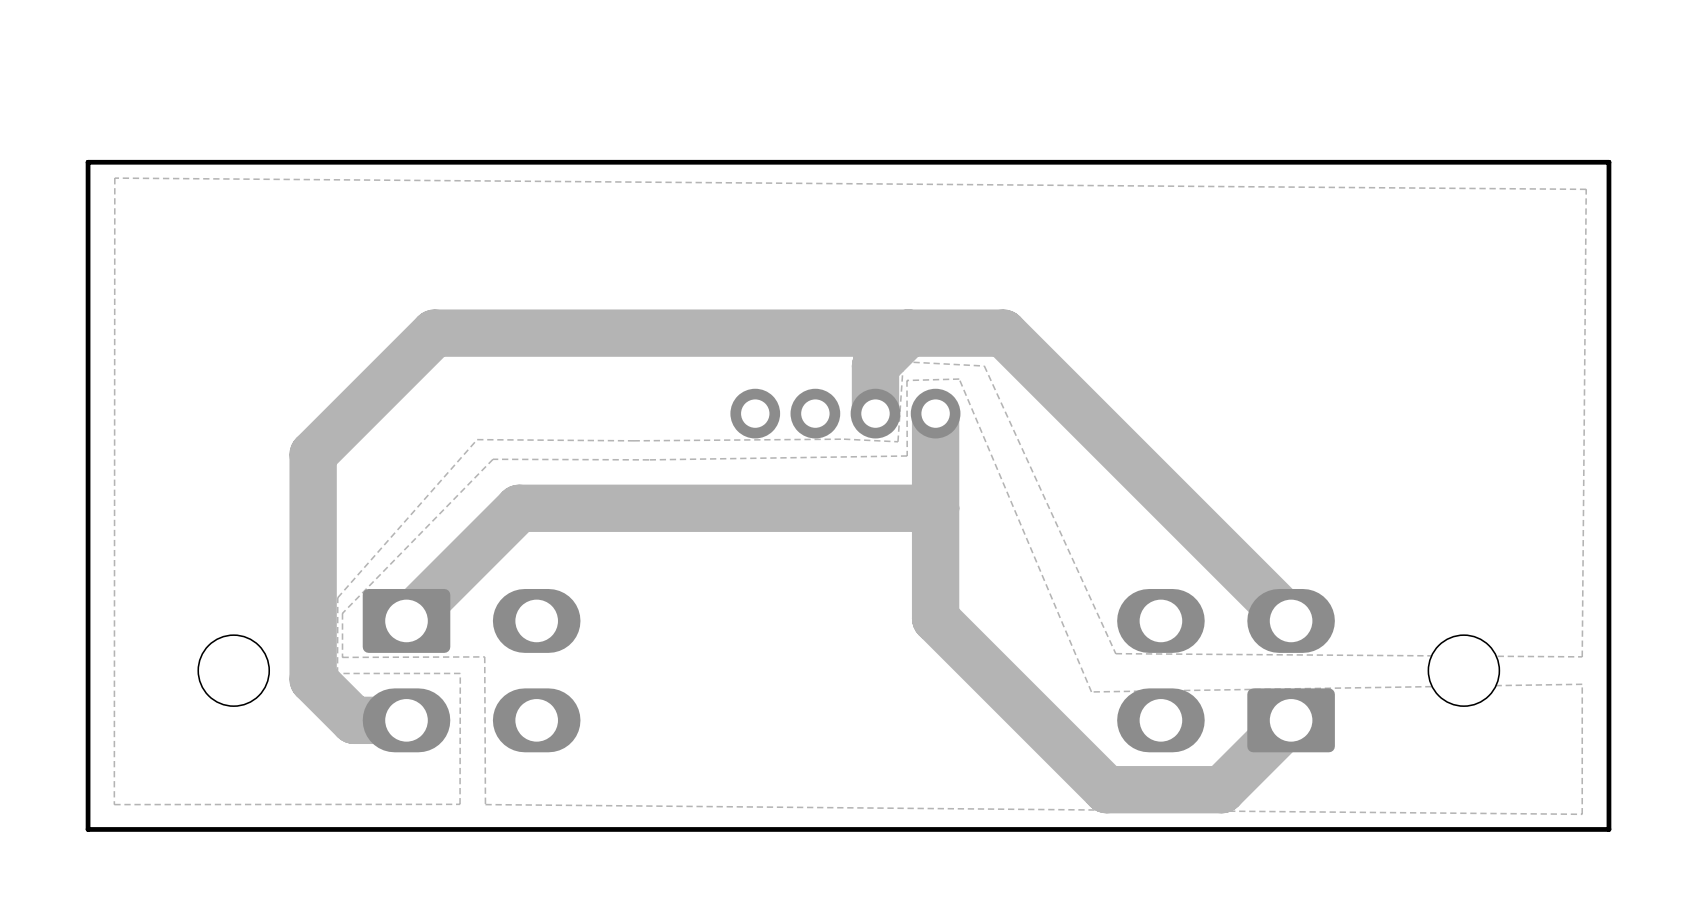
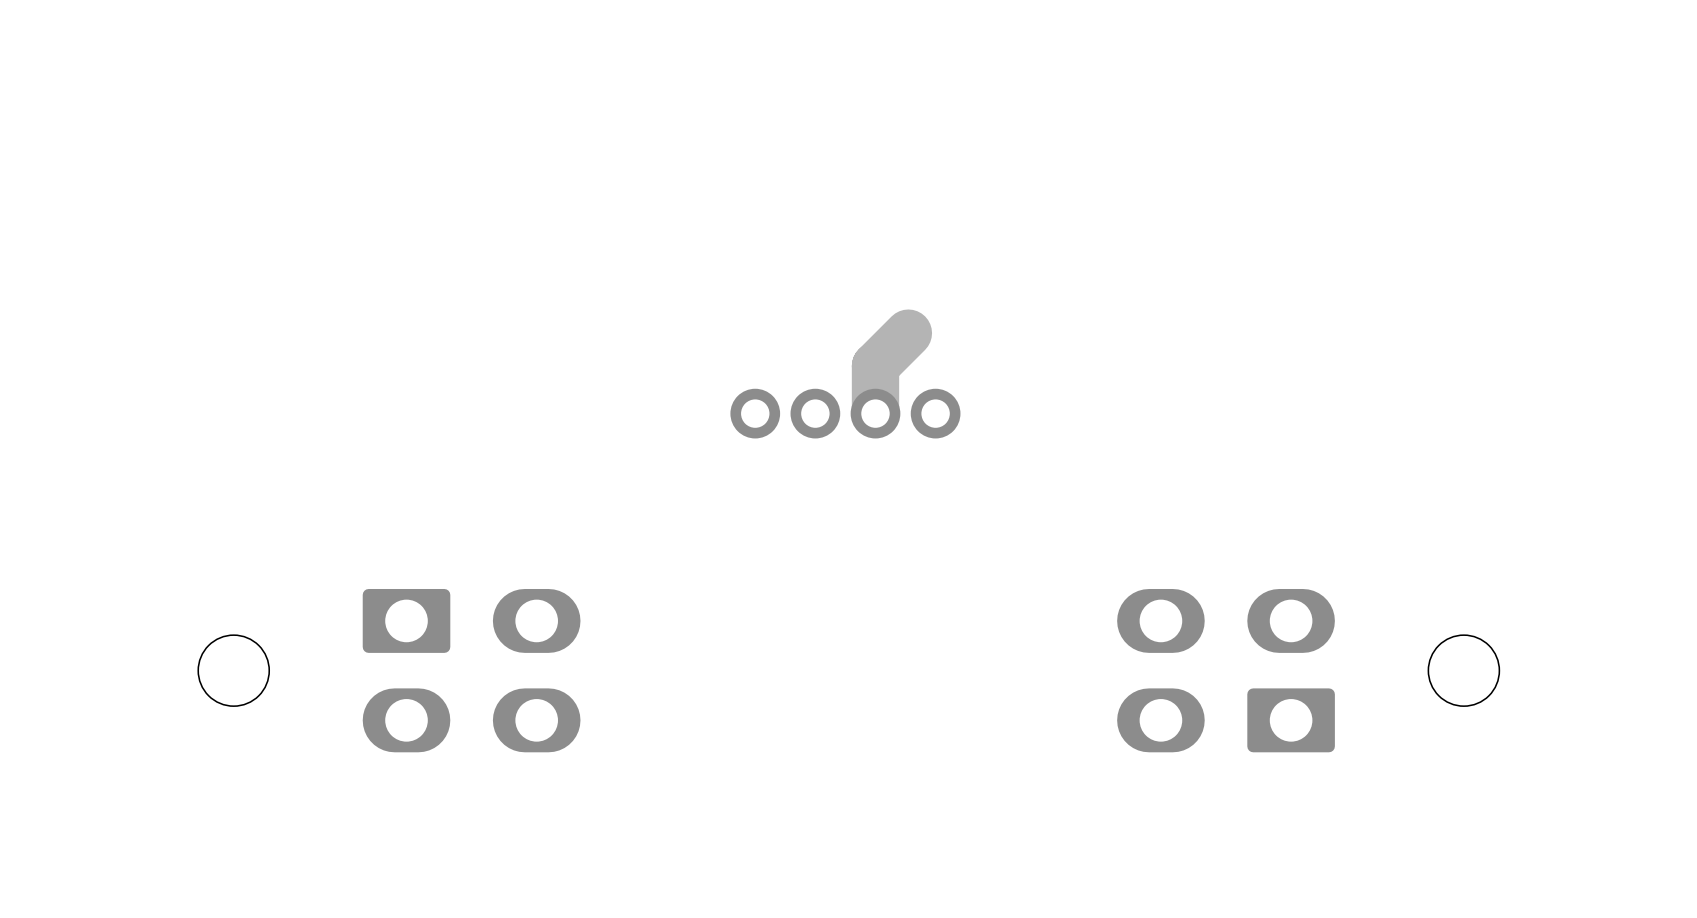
board edge: (1608, 162) (88, 162) (88, 829) (1608, 829) (1608, 162) -> none
zone outline: (114, 178) (1586, 189) (1582, 656) (1115, 653) (984, 366) (903, 361) (897, 441) (844, 439) (477, 439) (337, 597) (337, 673) (460, 673) (460, 804) (114, 804) (114, 178) -> none
zone outline: (959, 379) (1091, 691) (1582, 684) (1582, 814) (485, 804) (484, 656) (342, 657) (342, 613) (493, 459) (649, 459) (907, 455) (906, 380) (959, 379) -> none
track: (935, 413) (935, 618) (1106, 789) (1221, 789) (1291, 720) -> none
track: (935, 508) (519, 508) (406, 620) -> none
track: (1291, 620) (1003, 333) (434, 333) (313, 454) (313, 679) (354, 720) (406, 720) -> none

